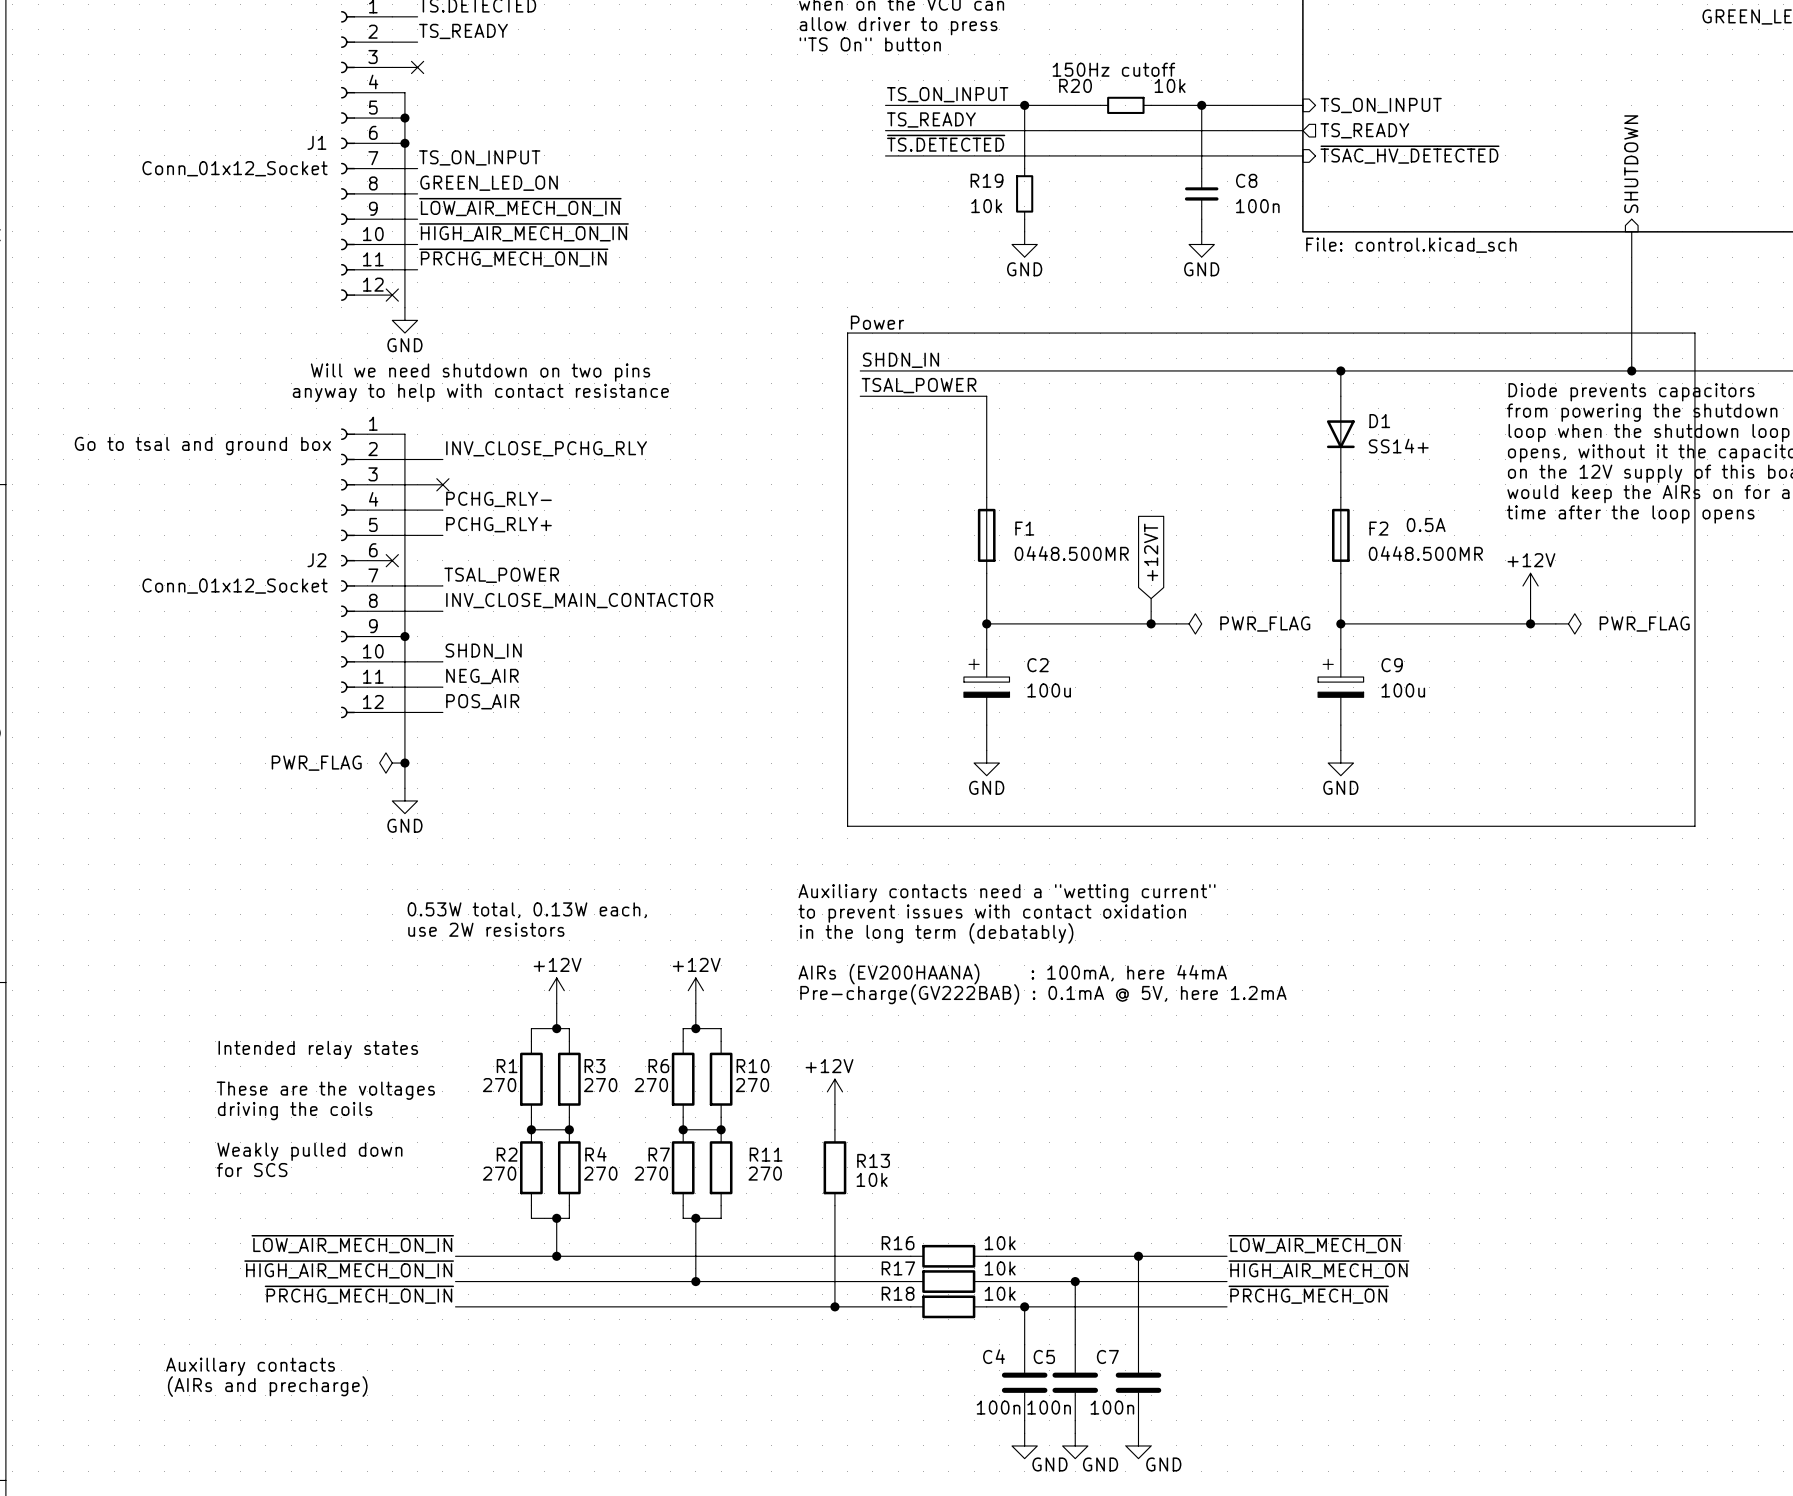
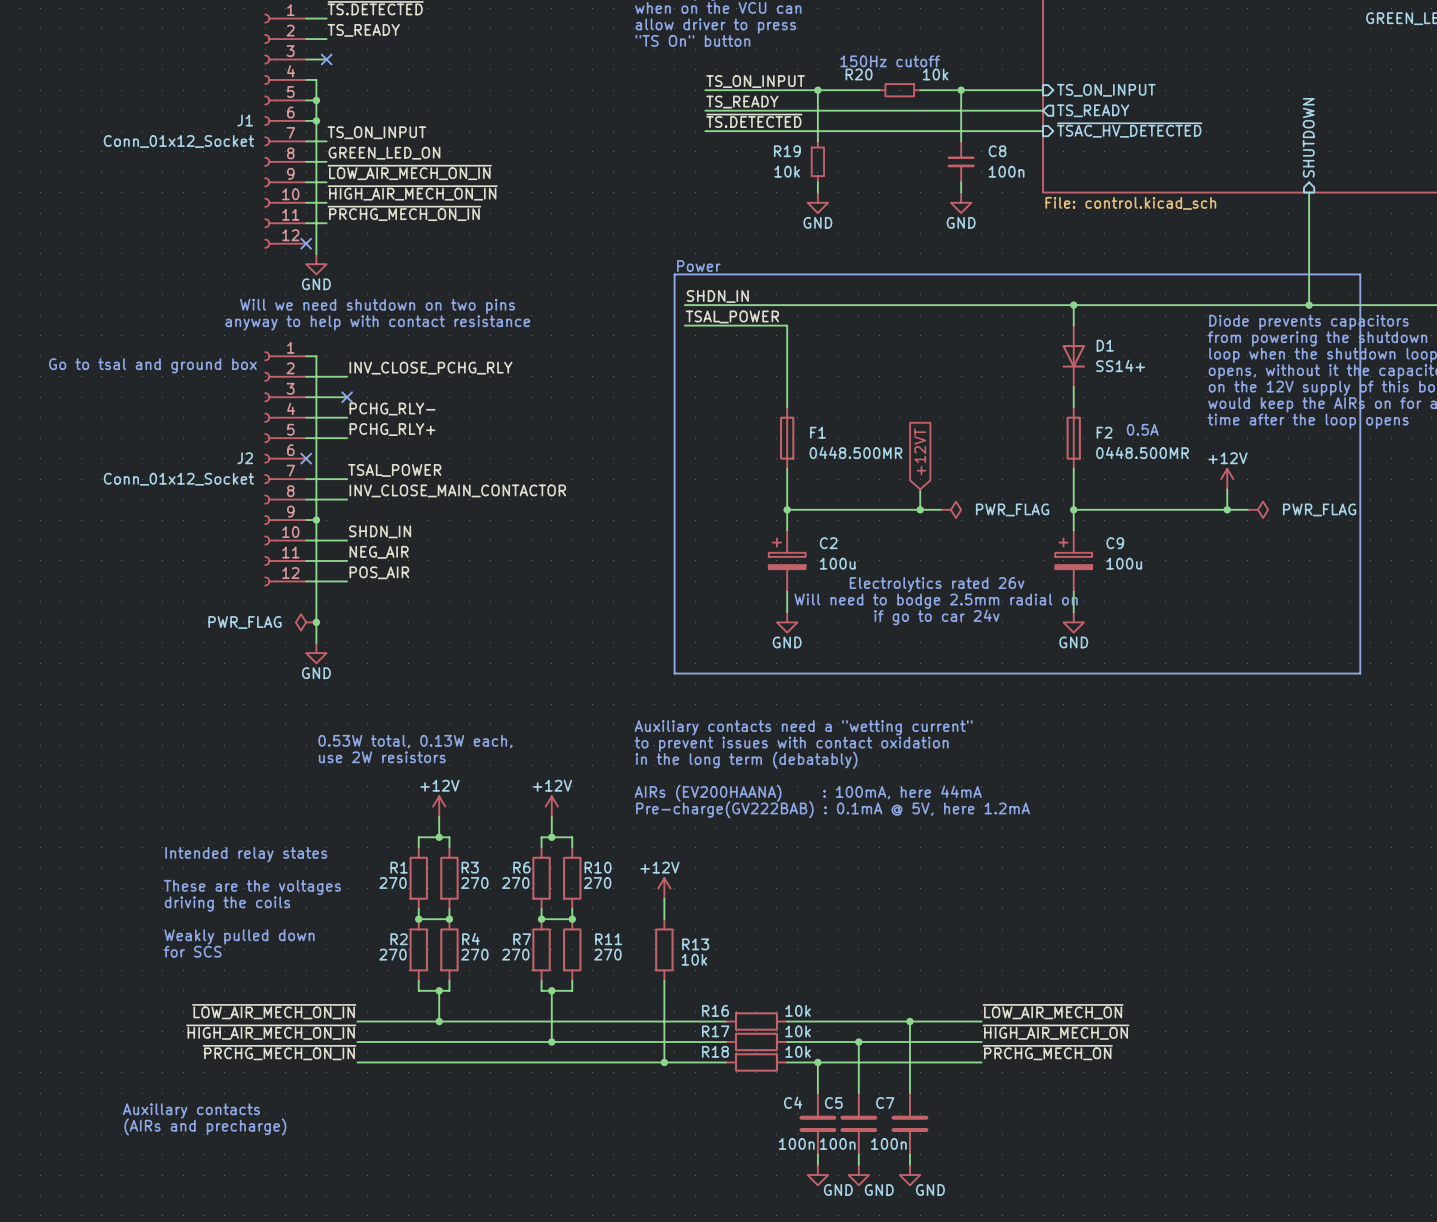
text: none -> Electrolytics rated 26v (937, 584)
text: none -> Will need to bodge 2.5mm radial on (936, 601)
text: none -> if go to car 24v (936, 617)

